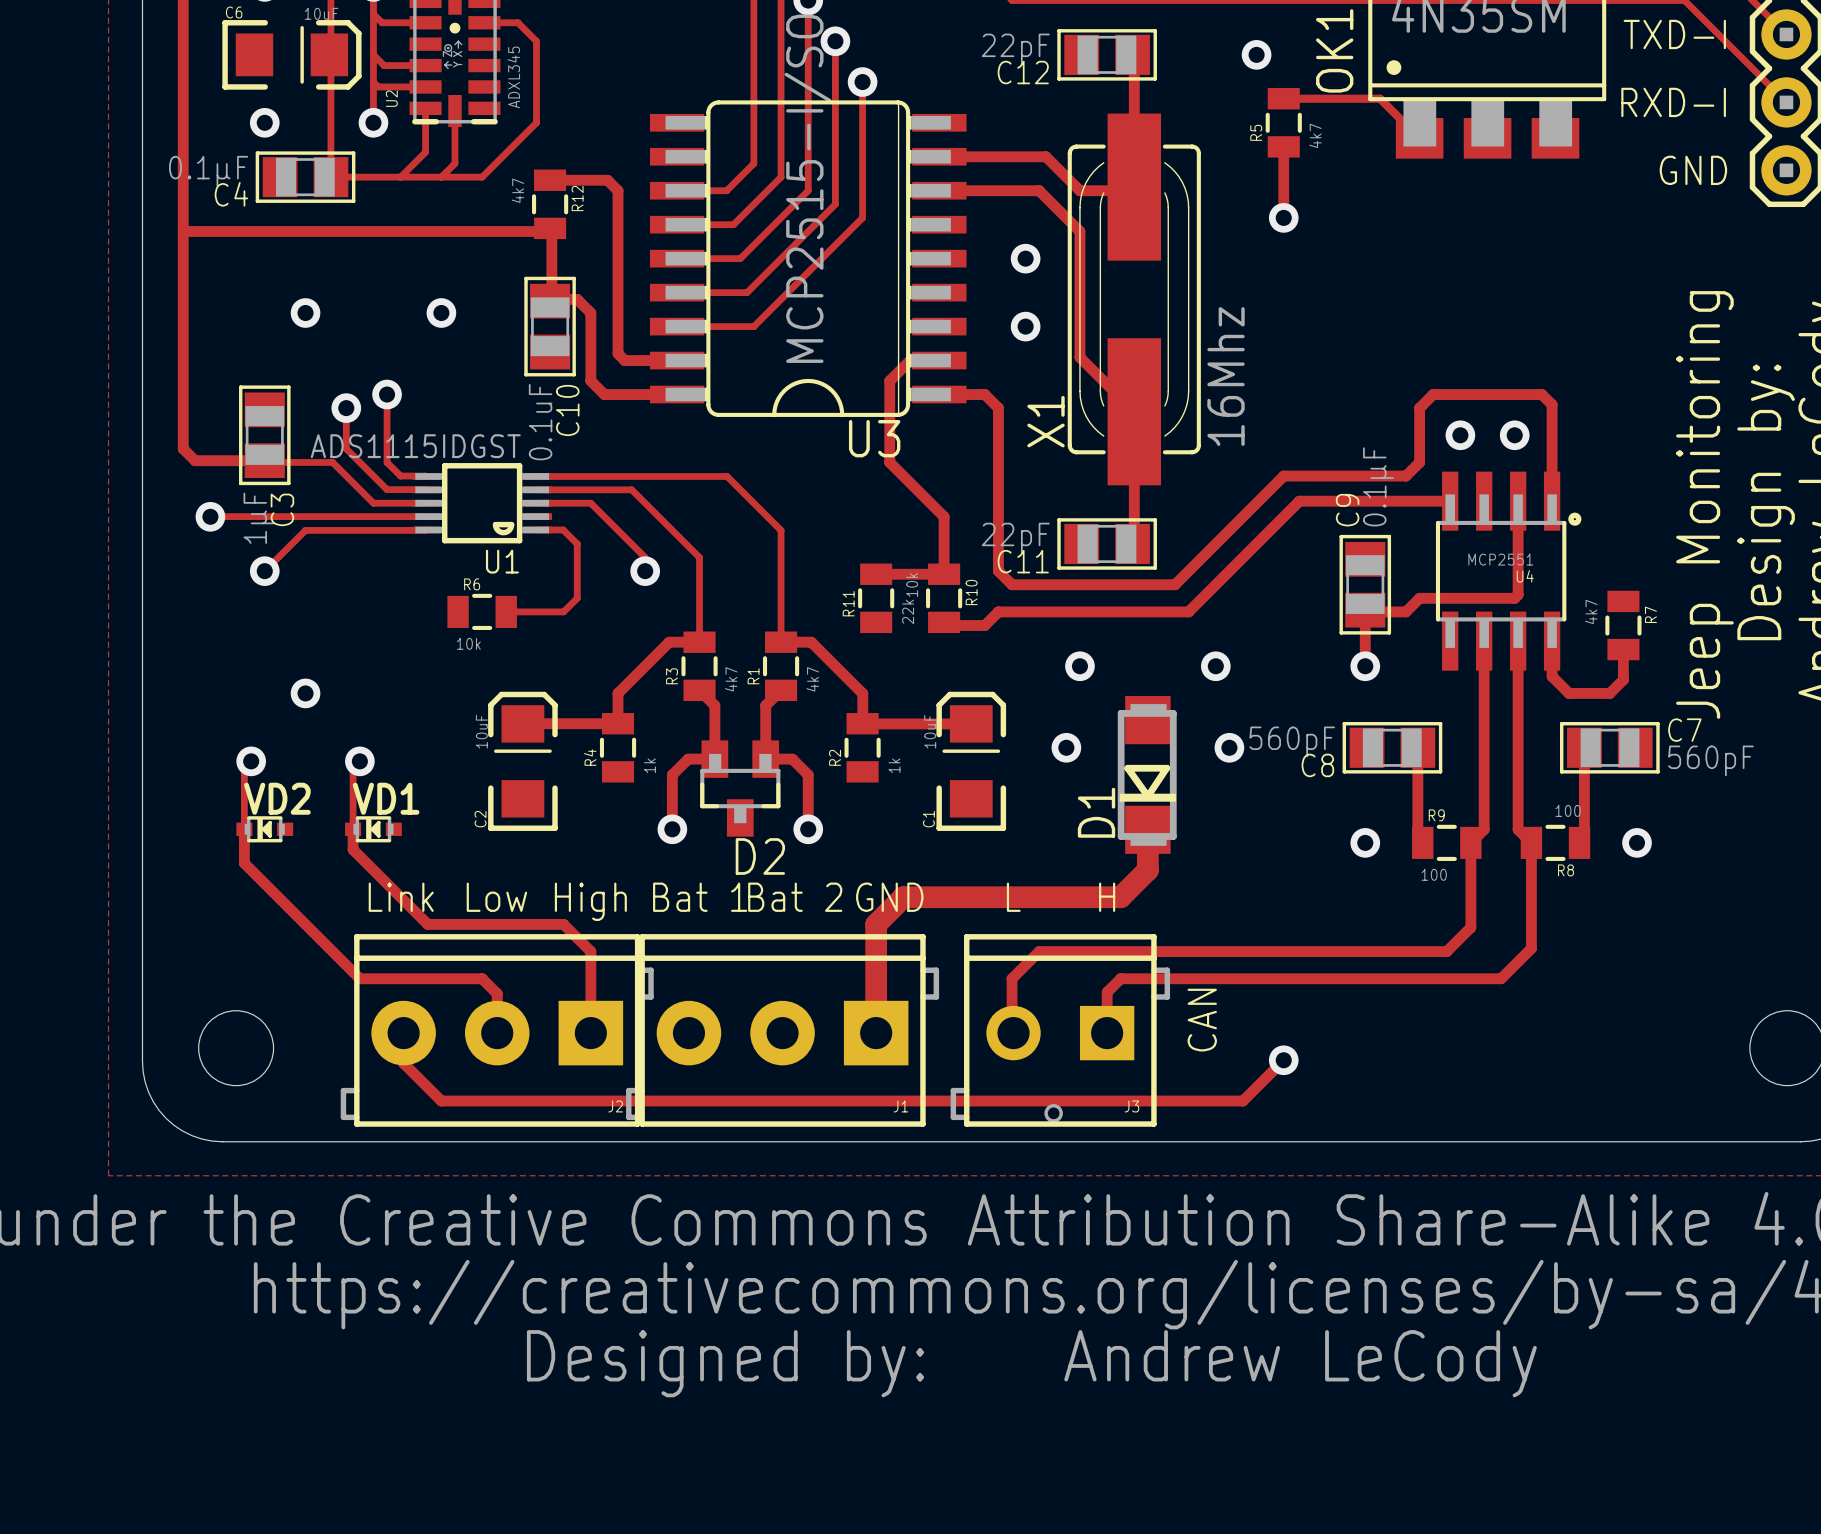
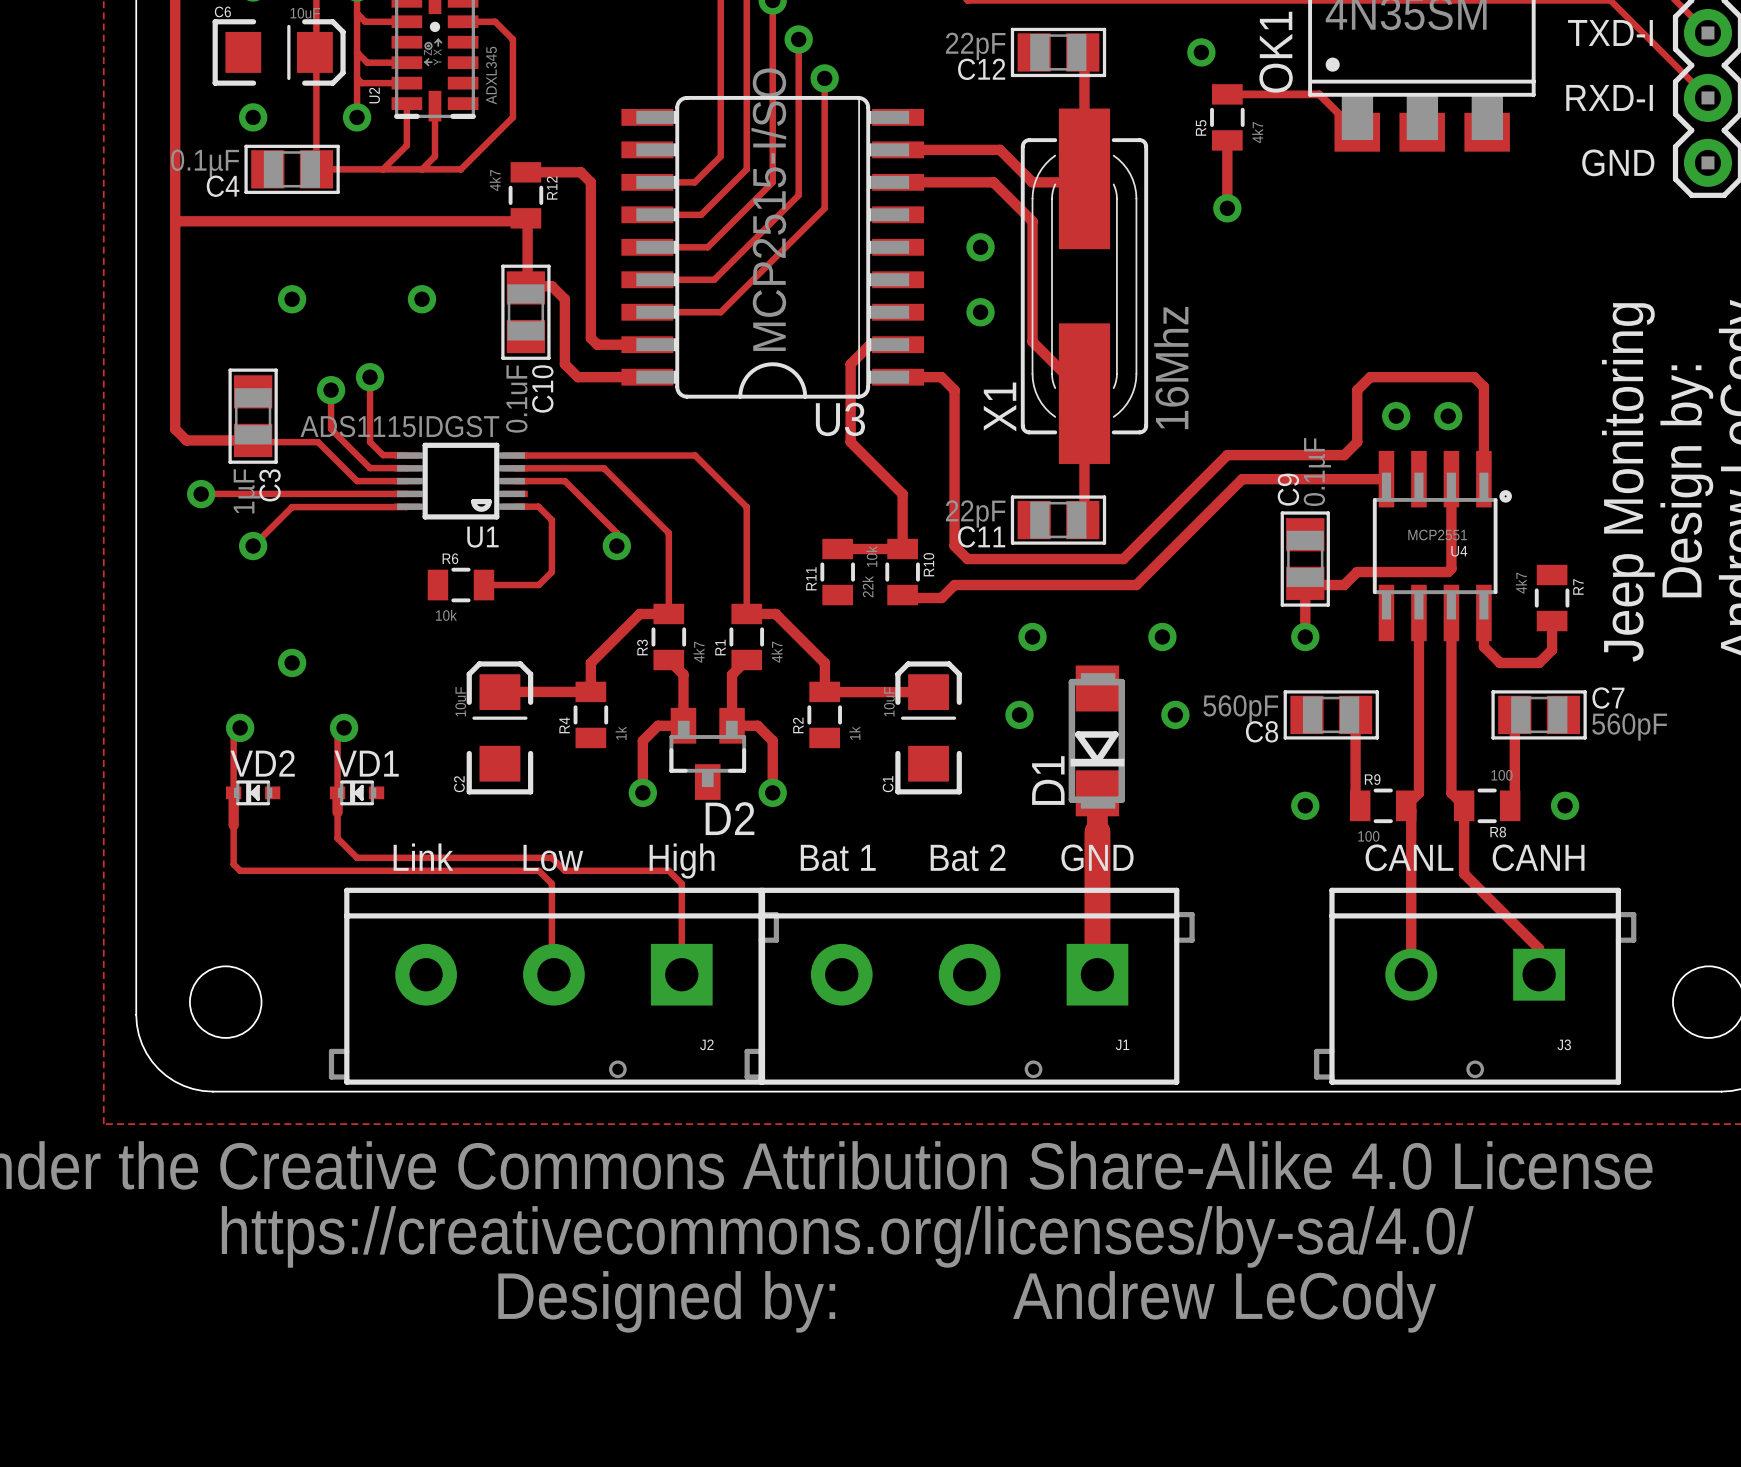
track: (1470, 842) (1470, 927) (1446, 951) (1039, 951) (1012, 978) (1013, 1033) -> (1406, 805) (1411, 810) (1411, 974)
track: (353, 849) (427, 924) (563, 924) (590, 951) (590, 1033) -> (337, 812) (337, 838) (357, 857) (551, 857) (564, 870) (668, 870) (681, 883) (681, 974)
track: (244, 863) (359, 978) (482, 978) (497, 993) (497, 1033) -> (233, 825) (233, 864) (240, 870) (538, 870) (551, 883) (551, 972) (553, 974)
track: (1147, 870) (1120, 897) (903, 897) (876, 924) (876, 1033) -> (1097, 831) (1097, 974)
text position: Link (401, 897) -> Link (423, 857)
text position: Low (496, 897) -> Low (553, 857)
text position: Bat 1 (700, 897) -> Bat 1 (838, 857)
text: Bat 2 (795, 897) -> none
text position: GND (889, 897) -> GND (1097, 857)
text: L (1013, 897) -> Bat 2 (968, 857)
text: H (1107, 897) -> none
text: none -> CANL (1409, 857)
text: none -> CANH (1538, 857)
text position: High (590, 901) -> High (682, 861)
track: (1531, 913) (1531, 948) (1501, 978) (1120, 978) (1107, 992) (1107, 1033) -> (1464, 873) (1539, 948) (1539, 974)
J2 footprint: [340, 934, 654, 1127] -> [328, 887, 780, 1085]
J1 footprint: [626, 934, 940, 1127] -> [744, 887, 1195, 1085]
J3 footprint: [950, 934, 1171, 1127] -> [1314, 887, 1637, 1085]
text: CAN (1202, 1020) -> none
track: (403, 1033) (403, 1063) (441, 1101) (1243, 1101) (1283, 1060) -> none
via: (1283, 1060) -> none

